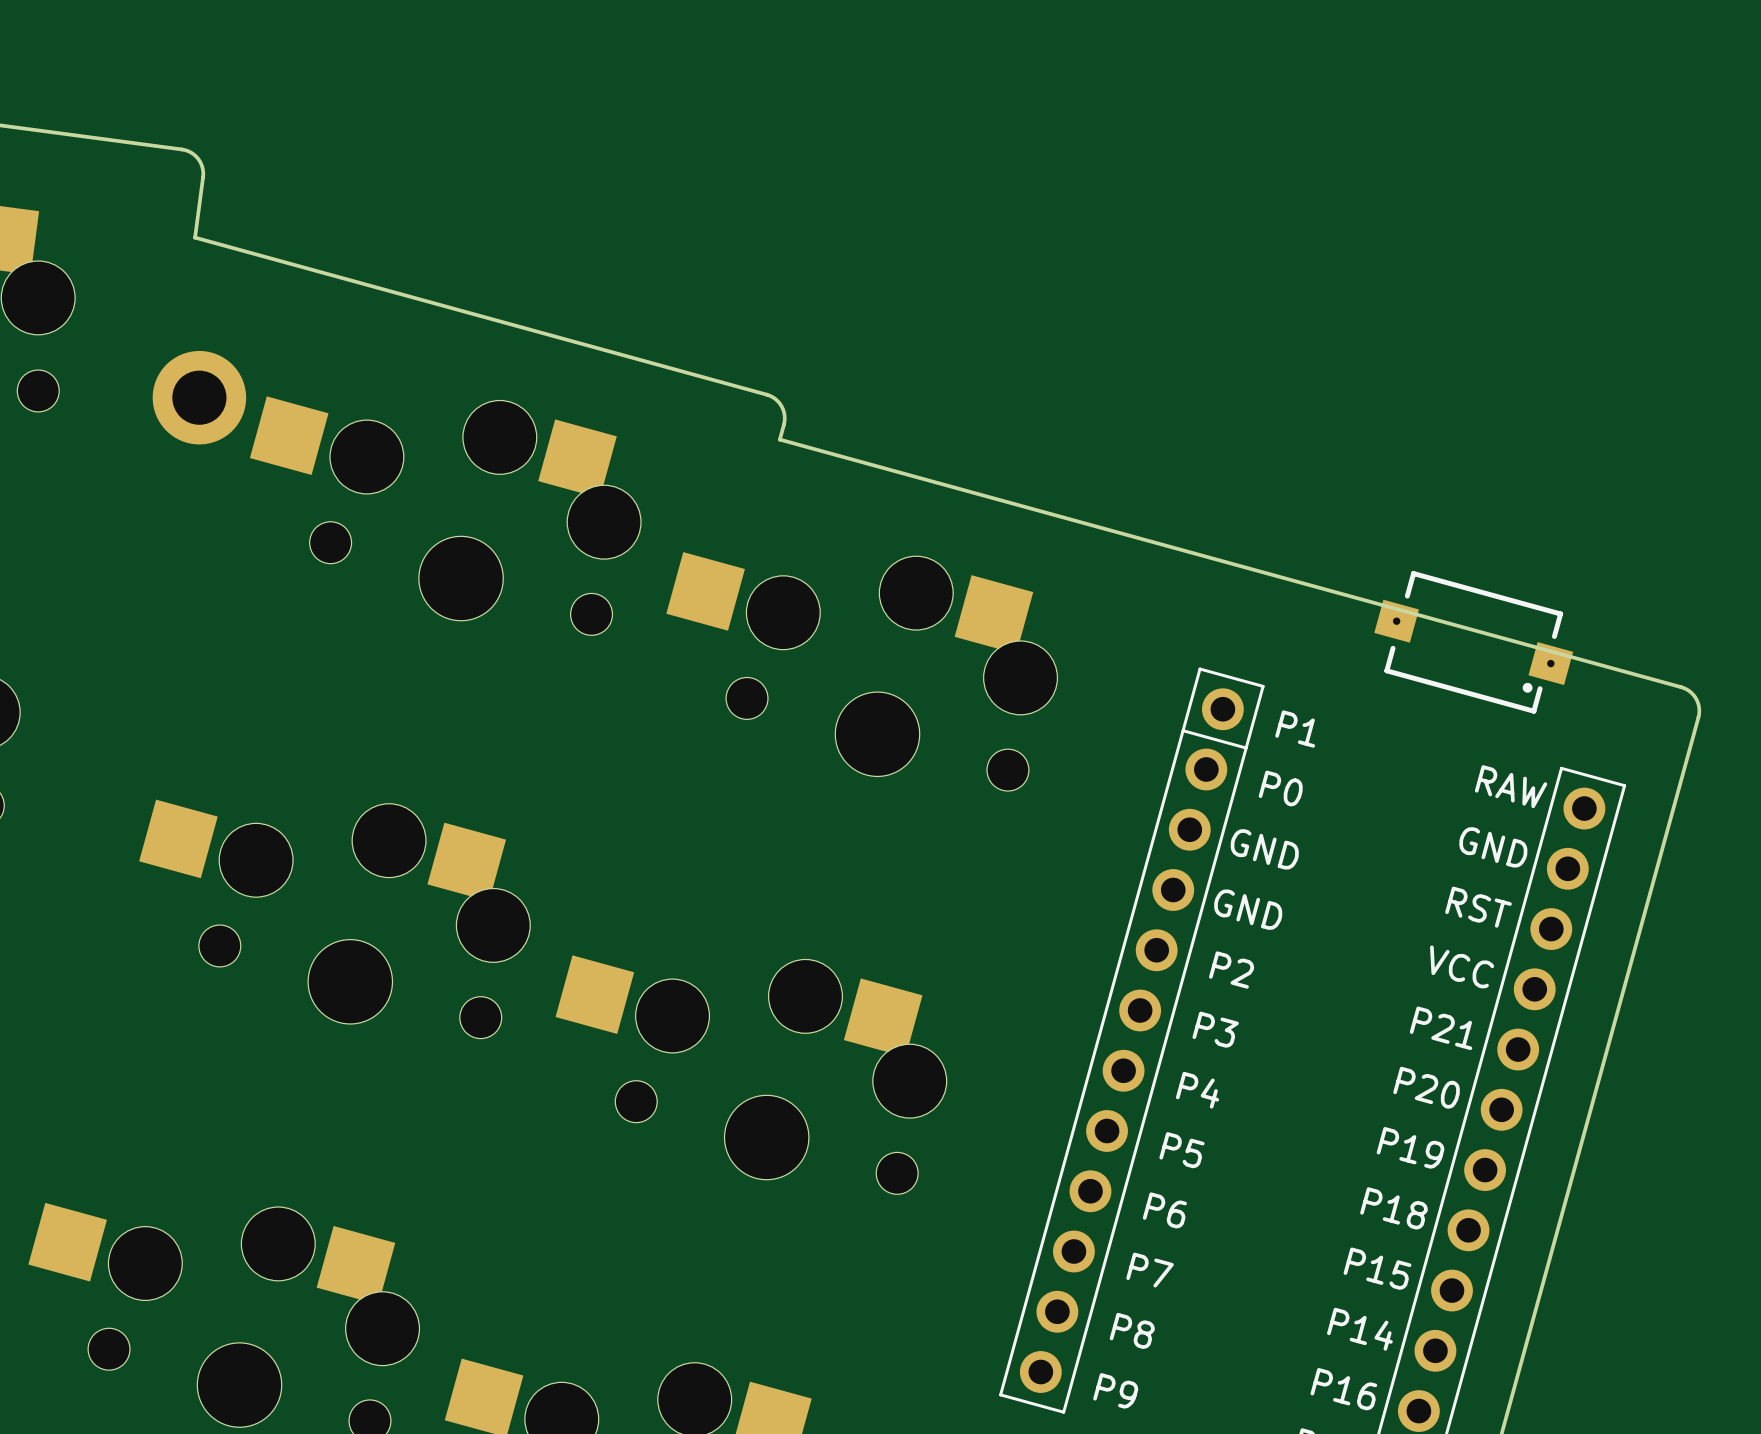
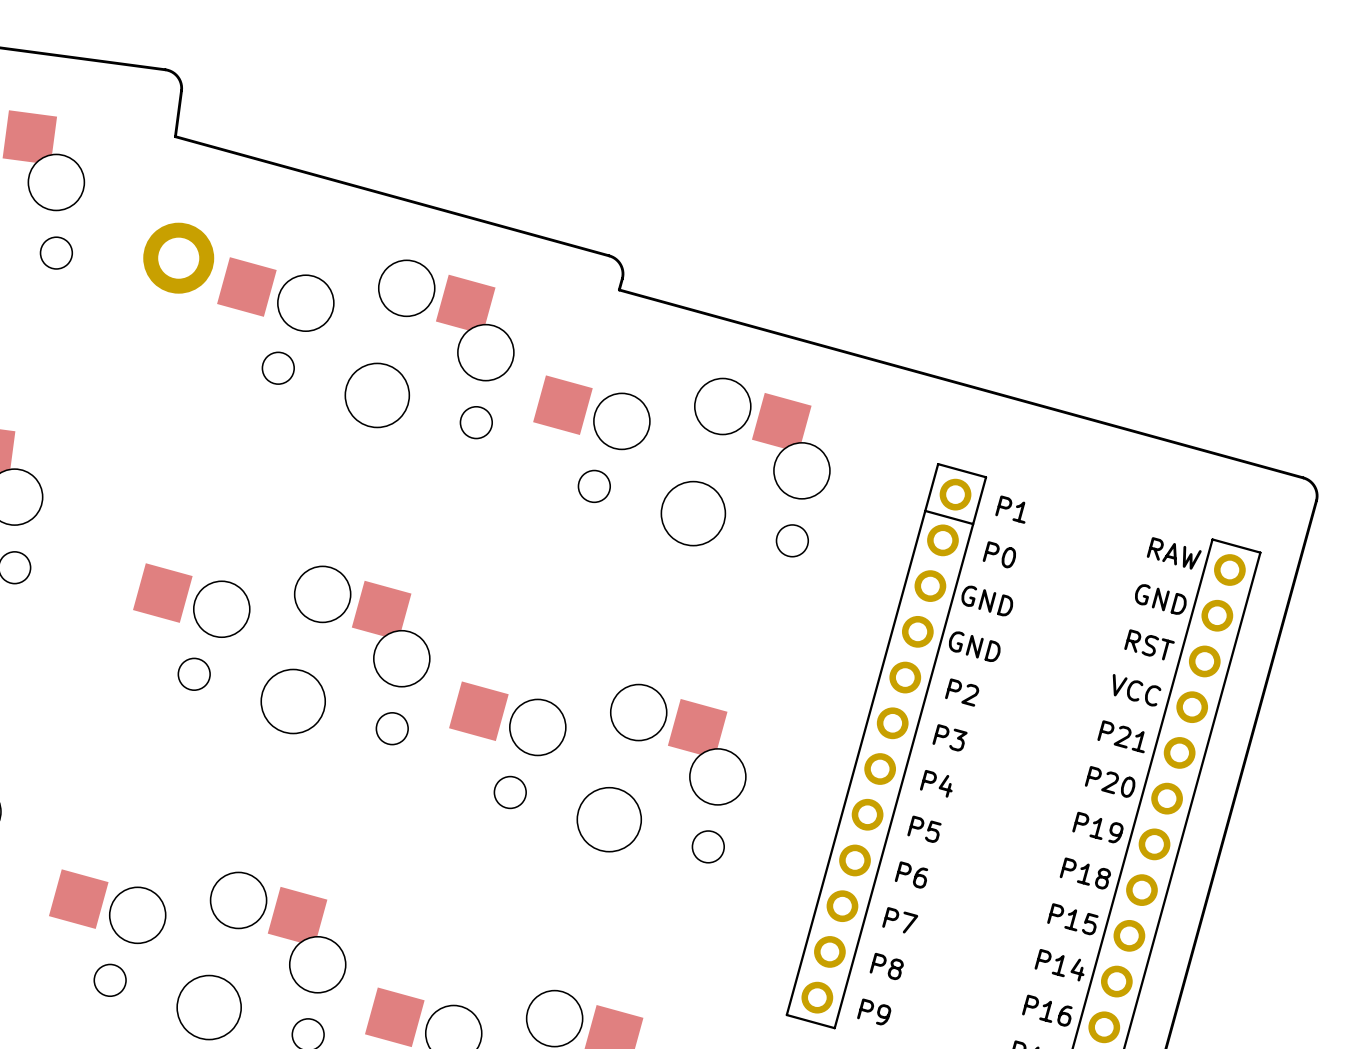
part: (1473, 642) -> none

